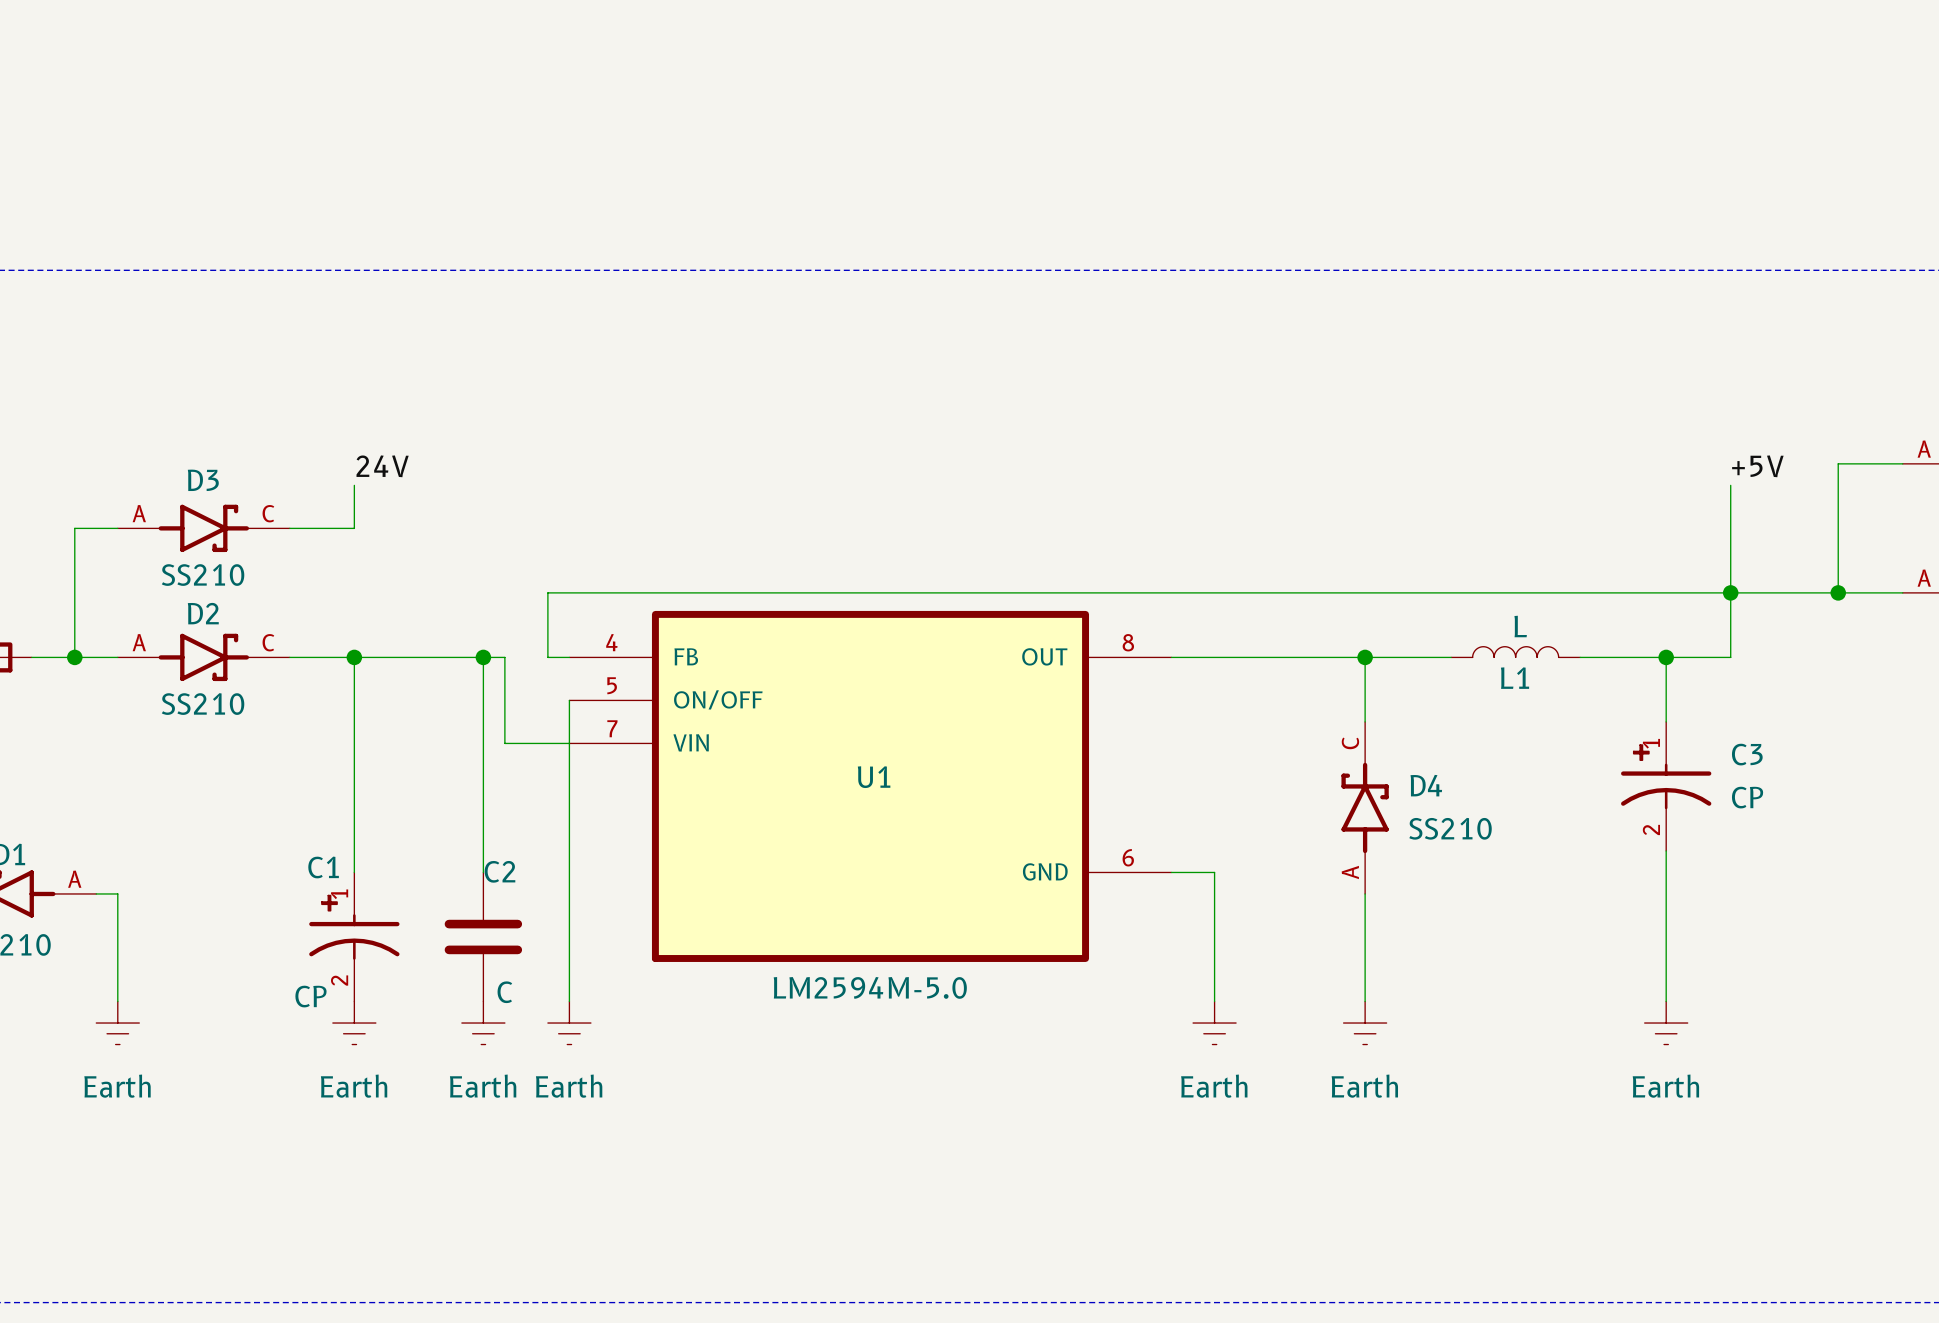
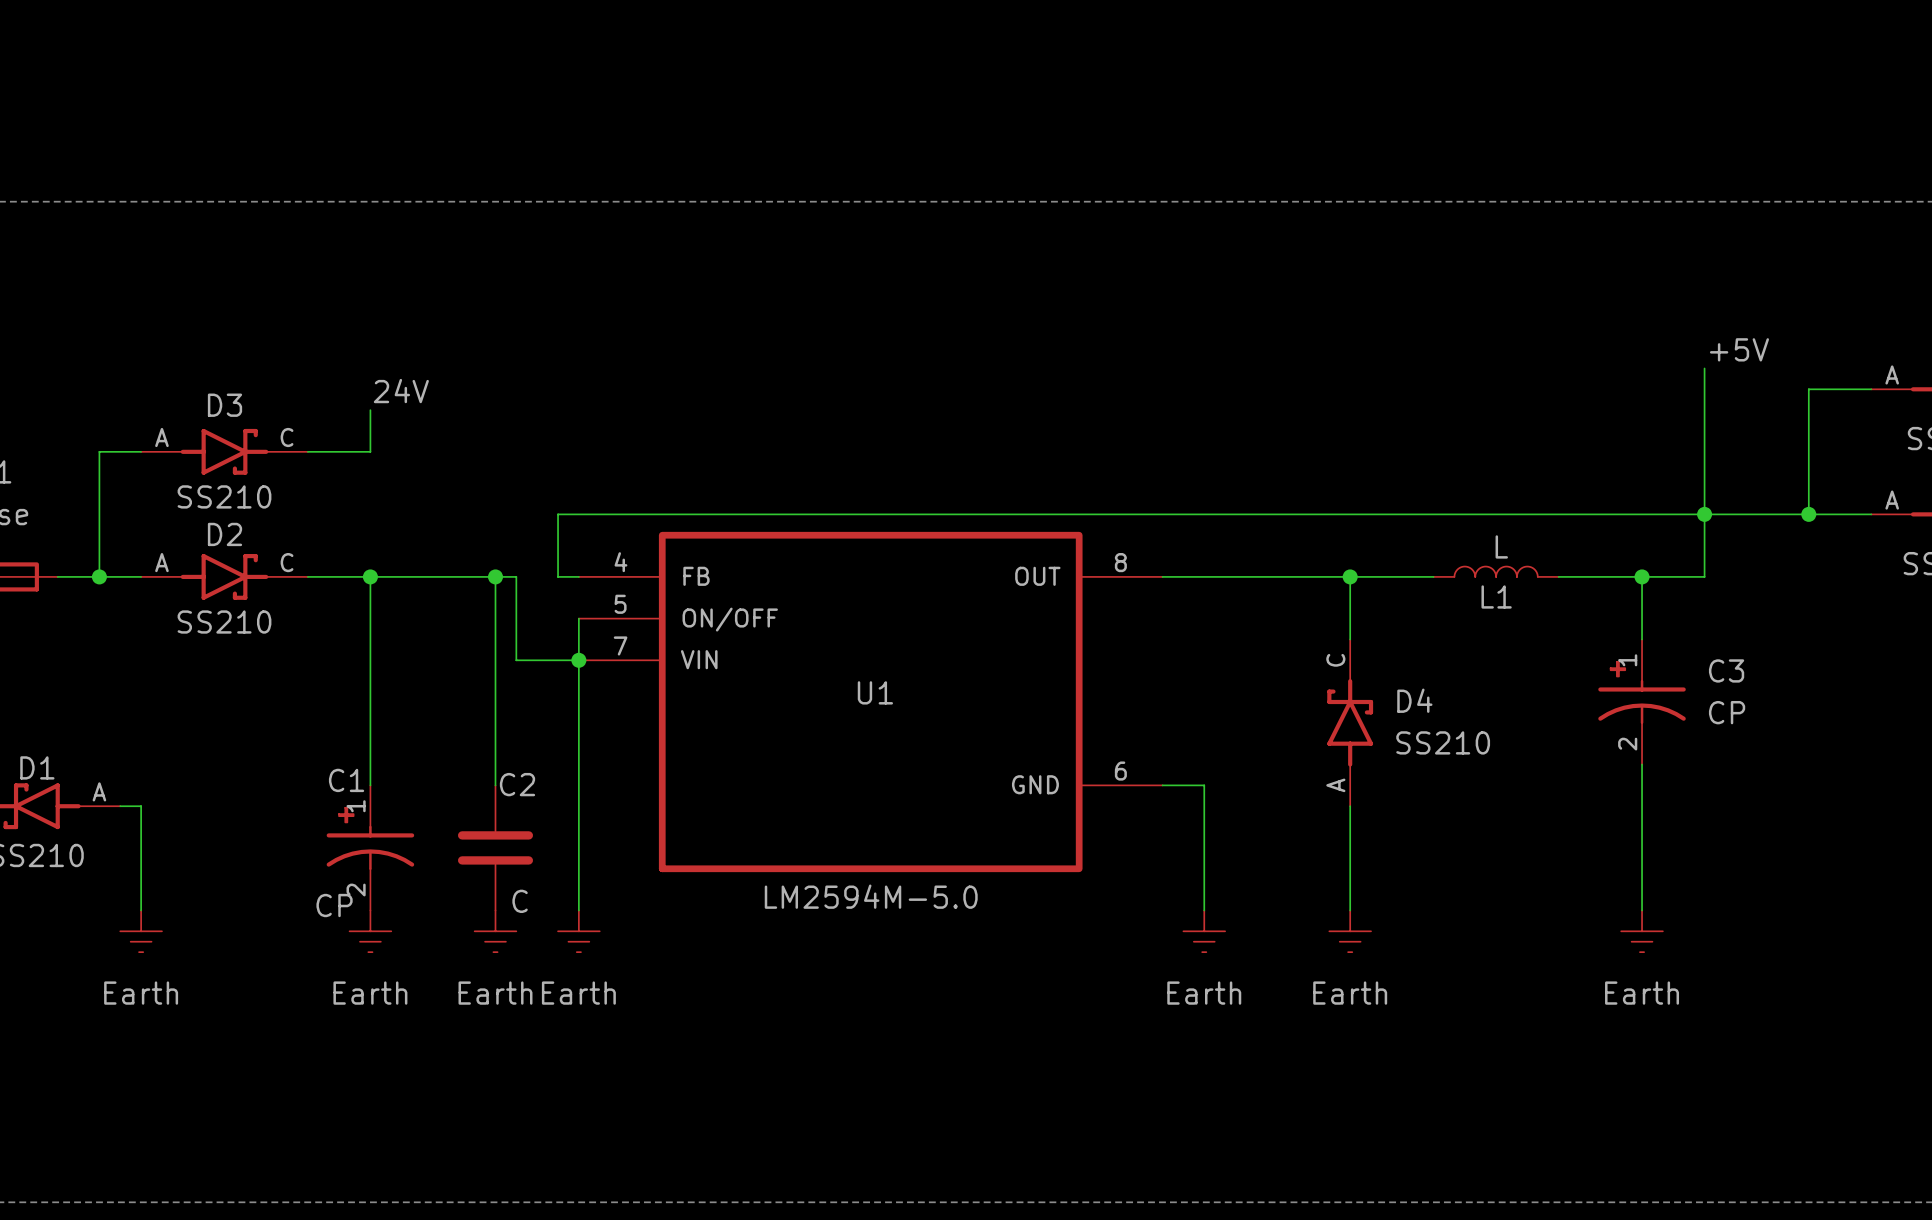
wire: none -> (1704, 368) (1704, 410)
label position: +5V (1757, 466) -> +5V (1739, 349)
junction: none -> (578, 660)

